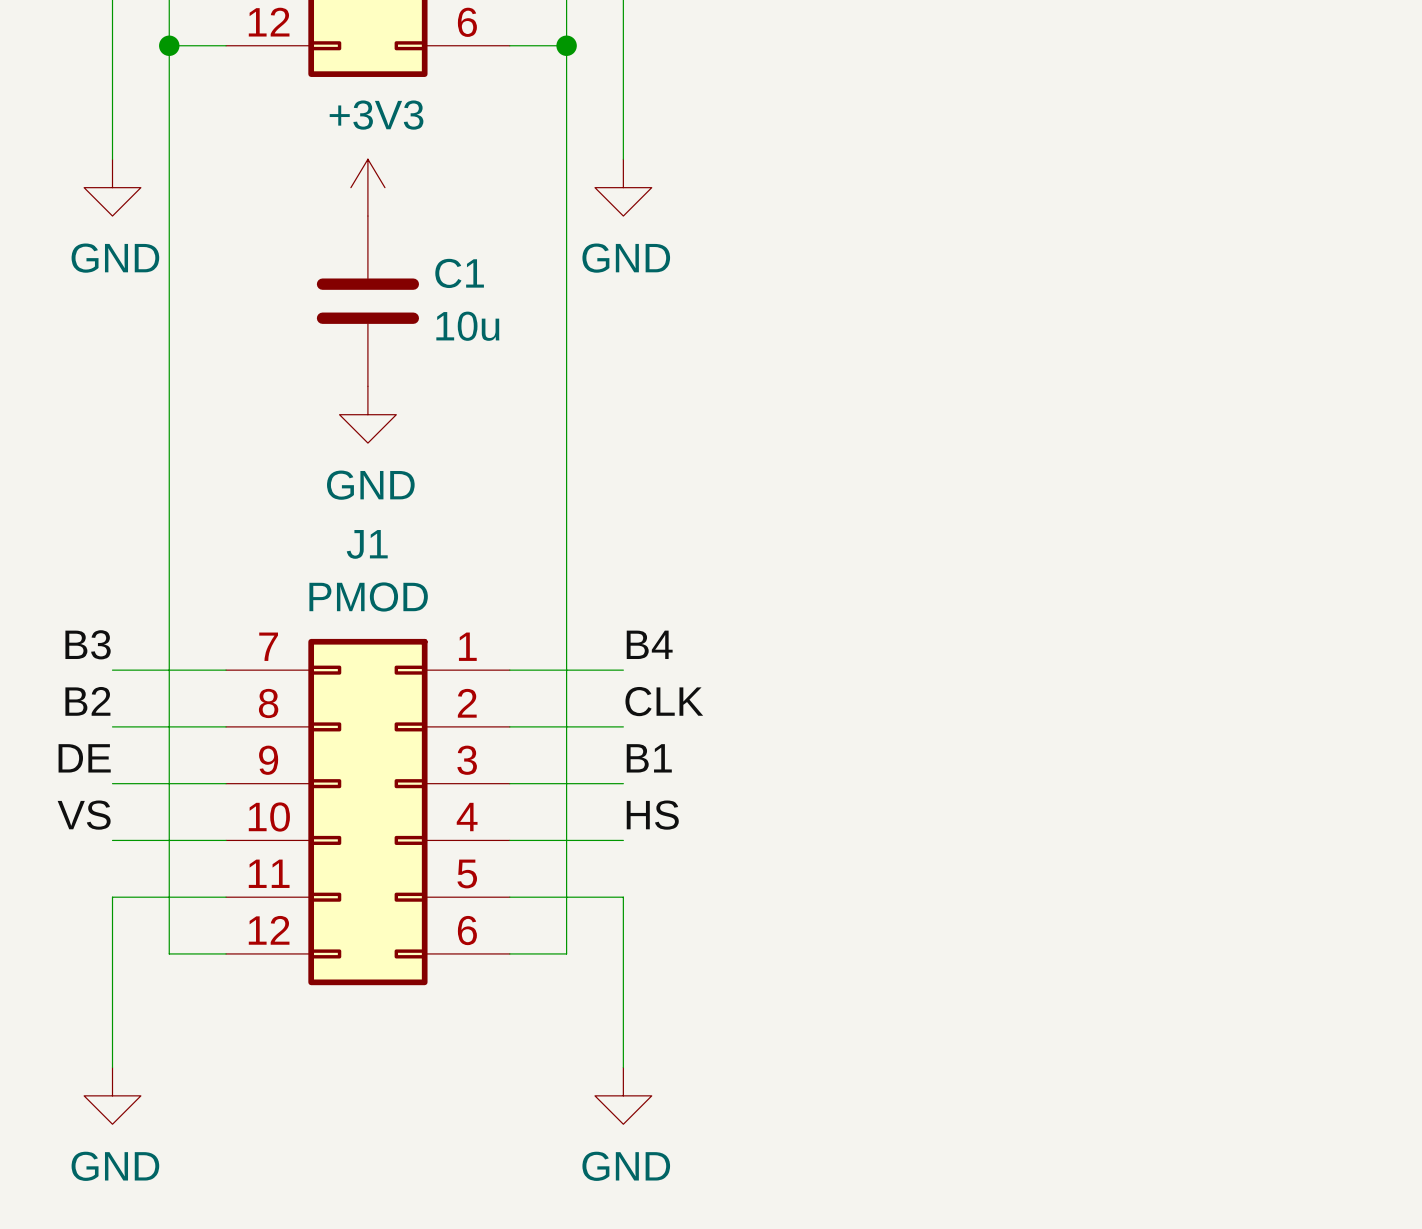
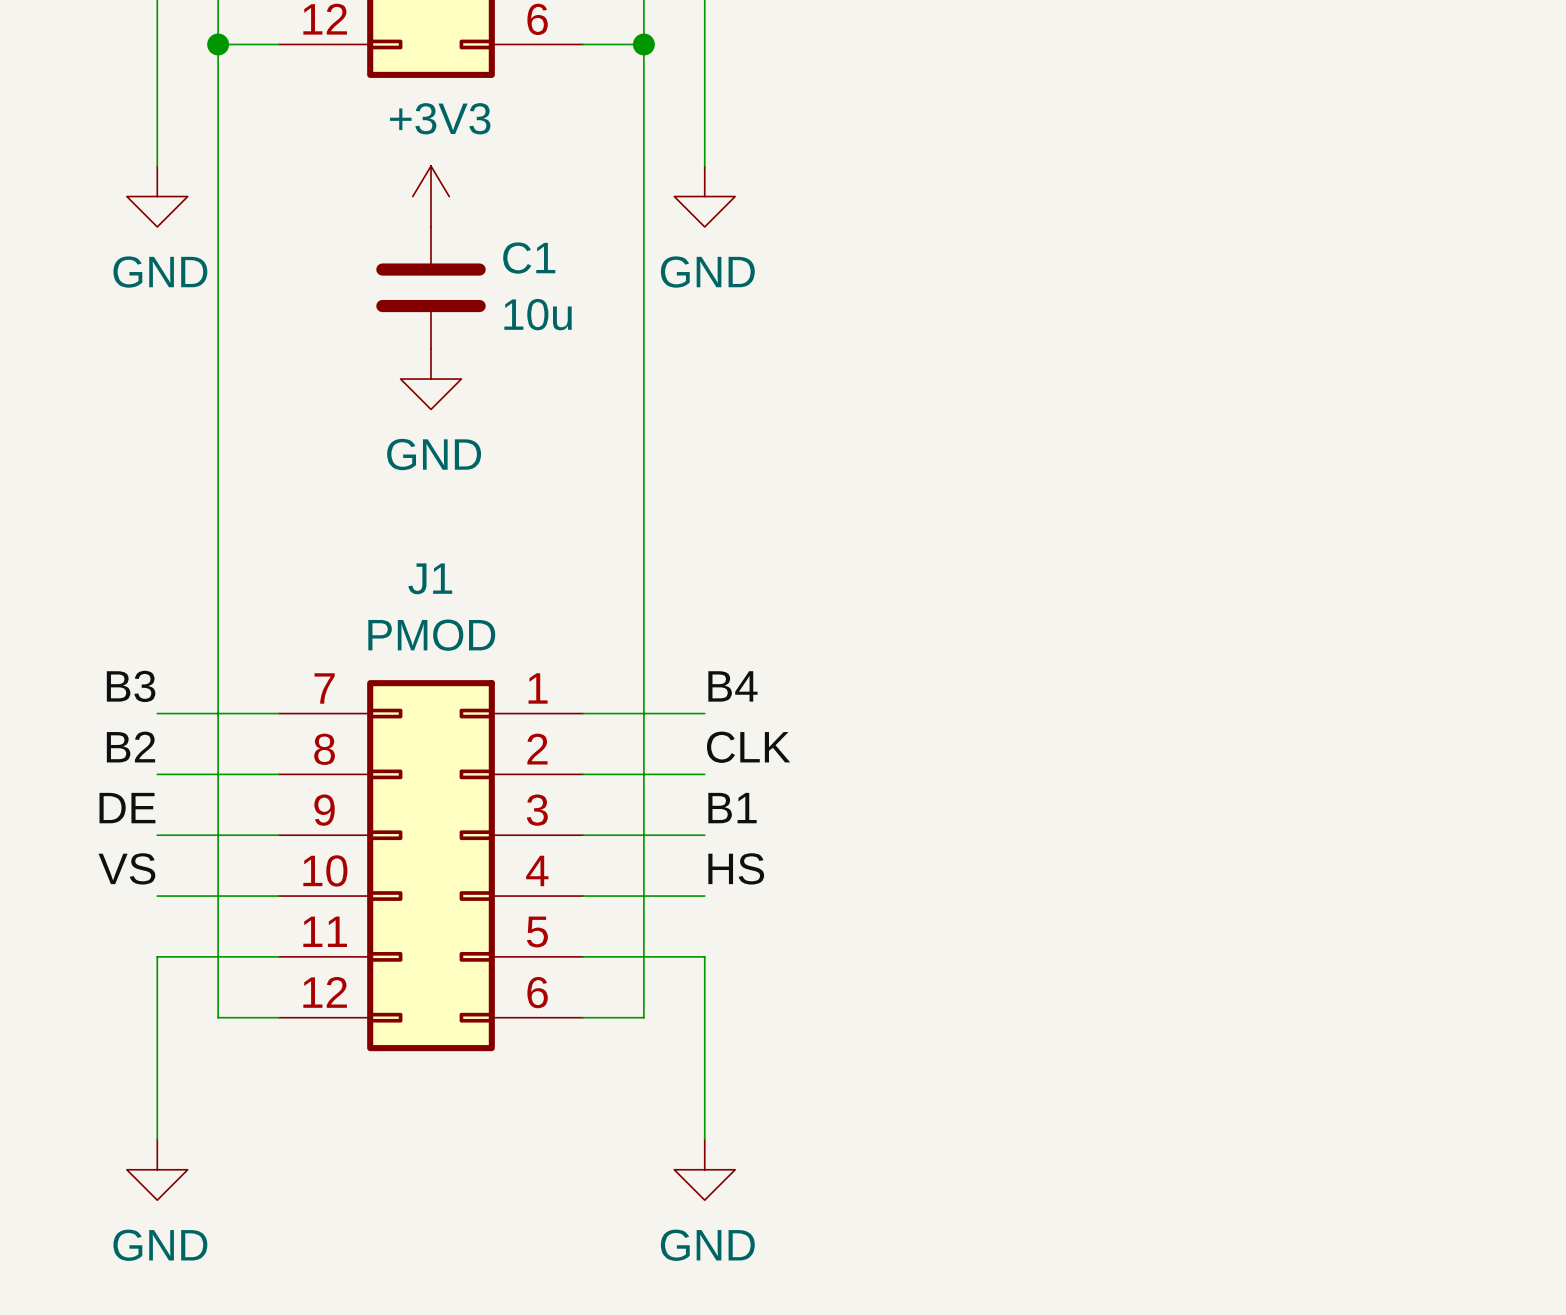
C1 symbol: [316, 216, 420, 387] -> [376, 226, 486, 349]
power symbol position: GND (367, 414) -> GND (431, 379)

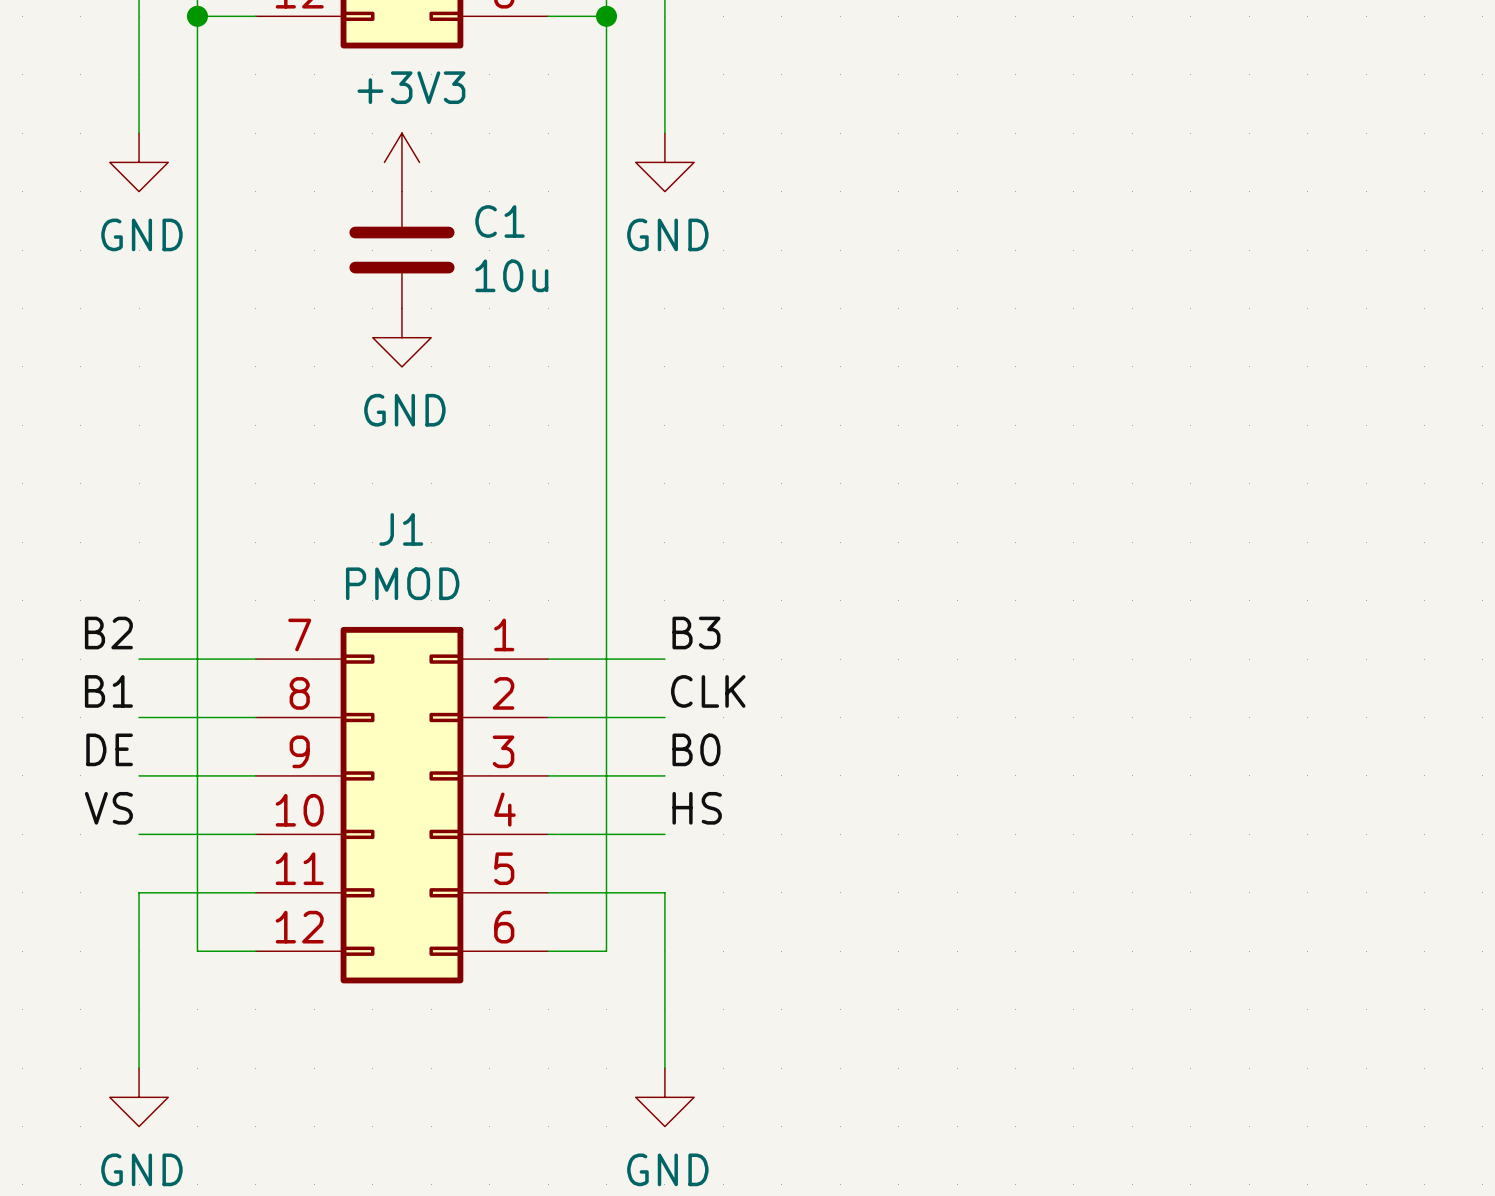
label: B3 (131, 686) -> B2 (108, 633)
label: B4 (732, 686) -> B3 (696, 633)
label: B2 (130, 747) -> B1 (108, 691)
label: B1 (732, 808) -> B0 (696, 749)

